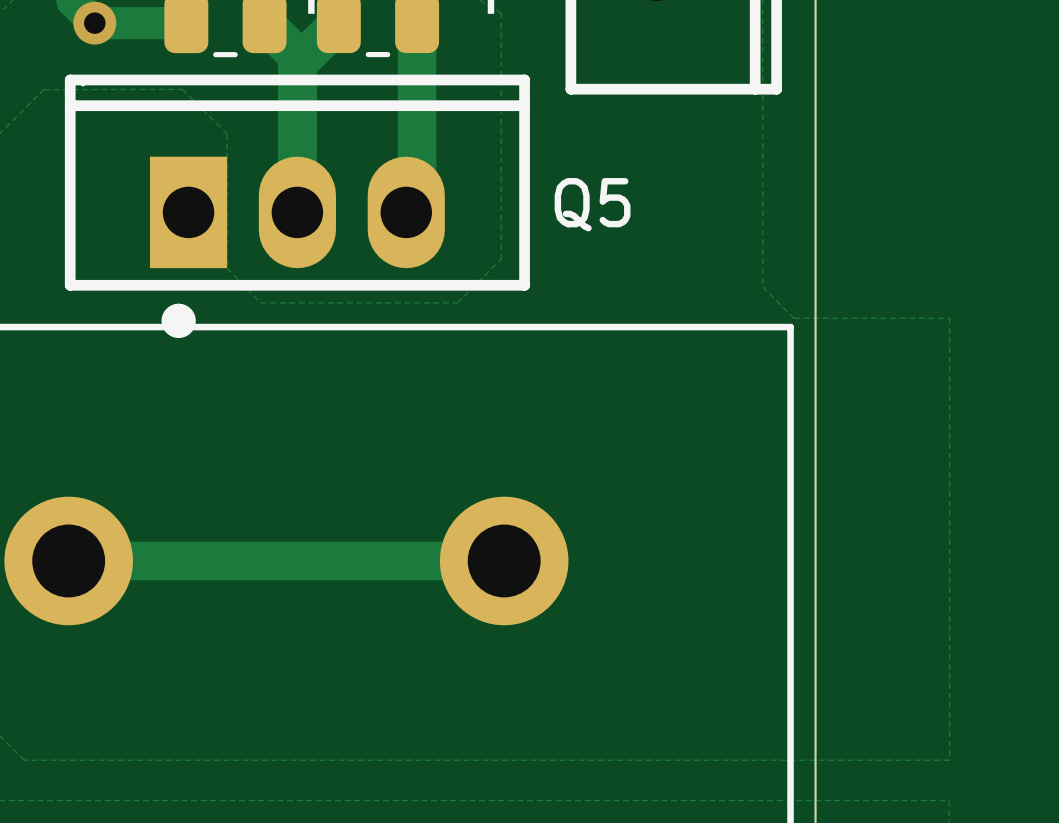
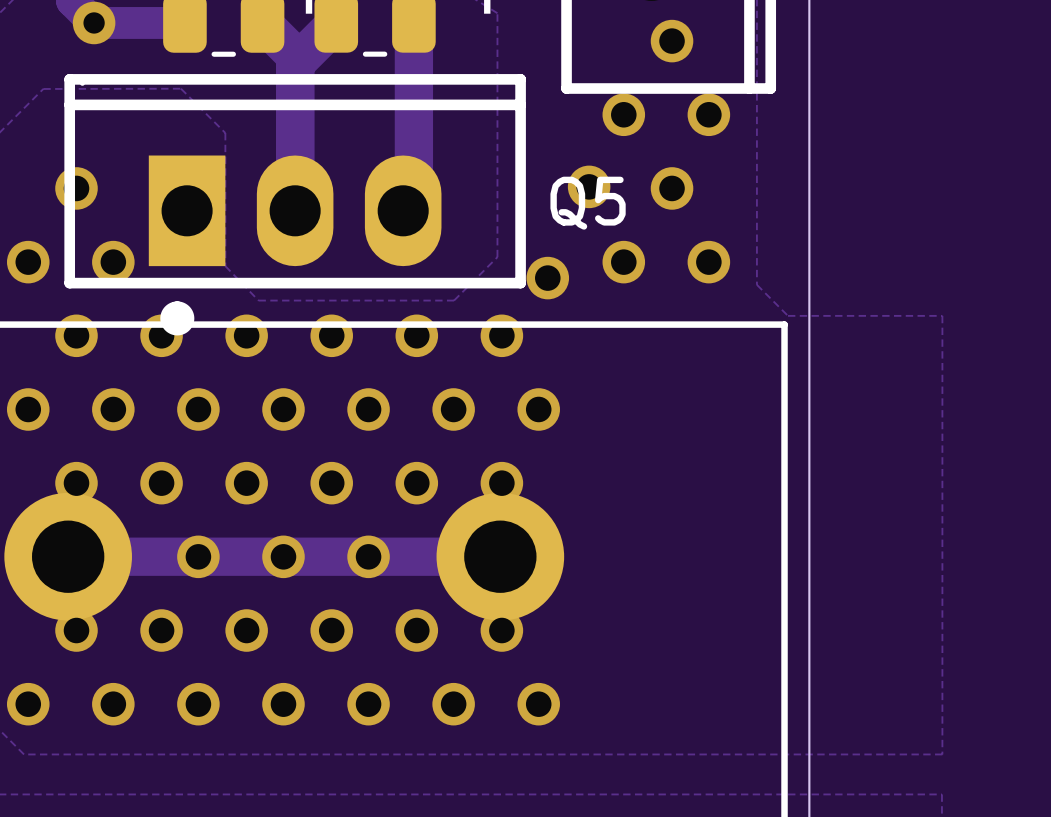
via: none -> (672, 41)
via: none -> (623, 114)
via: none -> (708, 114)
via: none -> (589, 186)
via: none -> (76, 188)
via: none -> (672, 188)
via: none -> (28, 262)
via: none -> (113, 262)
via: none -> (623, 262)
via: none -> (708, 262)
via: none -> (547, 278)
via: none -> (76, 335)
via: none -> (161, 335)
via: none -> (246, 335)
via: none -> (331, 335)
via: none -> (416, 335)
via: none -> (501, 335)
via: none -> (28, 409)
via: none -> (113, 409)
via: none -> (198, 409)
via: none -> (283, 409)
via: none -> (368, 409)
via: none -> (453, 409)
via: none -> (538, 409)
via: none -> (76, 483)
via: none -> (161, 483)
via: none -> (246, 483)
via: none -> (331, 483)
via: none -> (416, 483)
via: none -> (501, 483)
via: none -> (198, 556)
via: none -> (283, 556)
via: none -> (368, 556)
via: none -> (76, 630)
via: none -> (161, 630)
via: none -> (246, 630)
via: none -> (331, 630)
via: none -> (416, 630)
via: none -> (501, 630)
via: none -> (28, 704)
via: none -> (113, 704)
via: none -> (198, 704)
via: none -> (283, 704)
via: none -> (368, 704)
via: none -> (453, 704)
via: none -> (538, 704)

